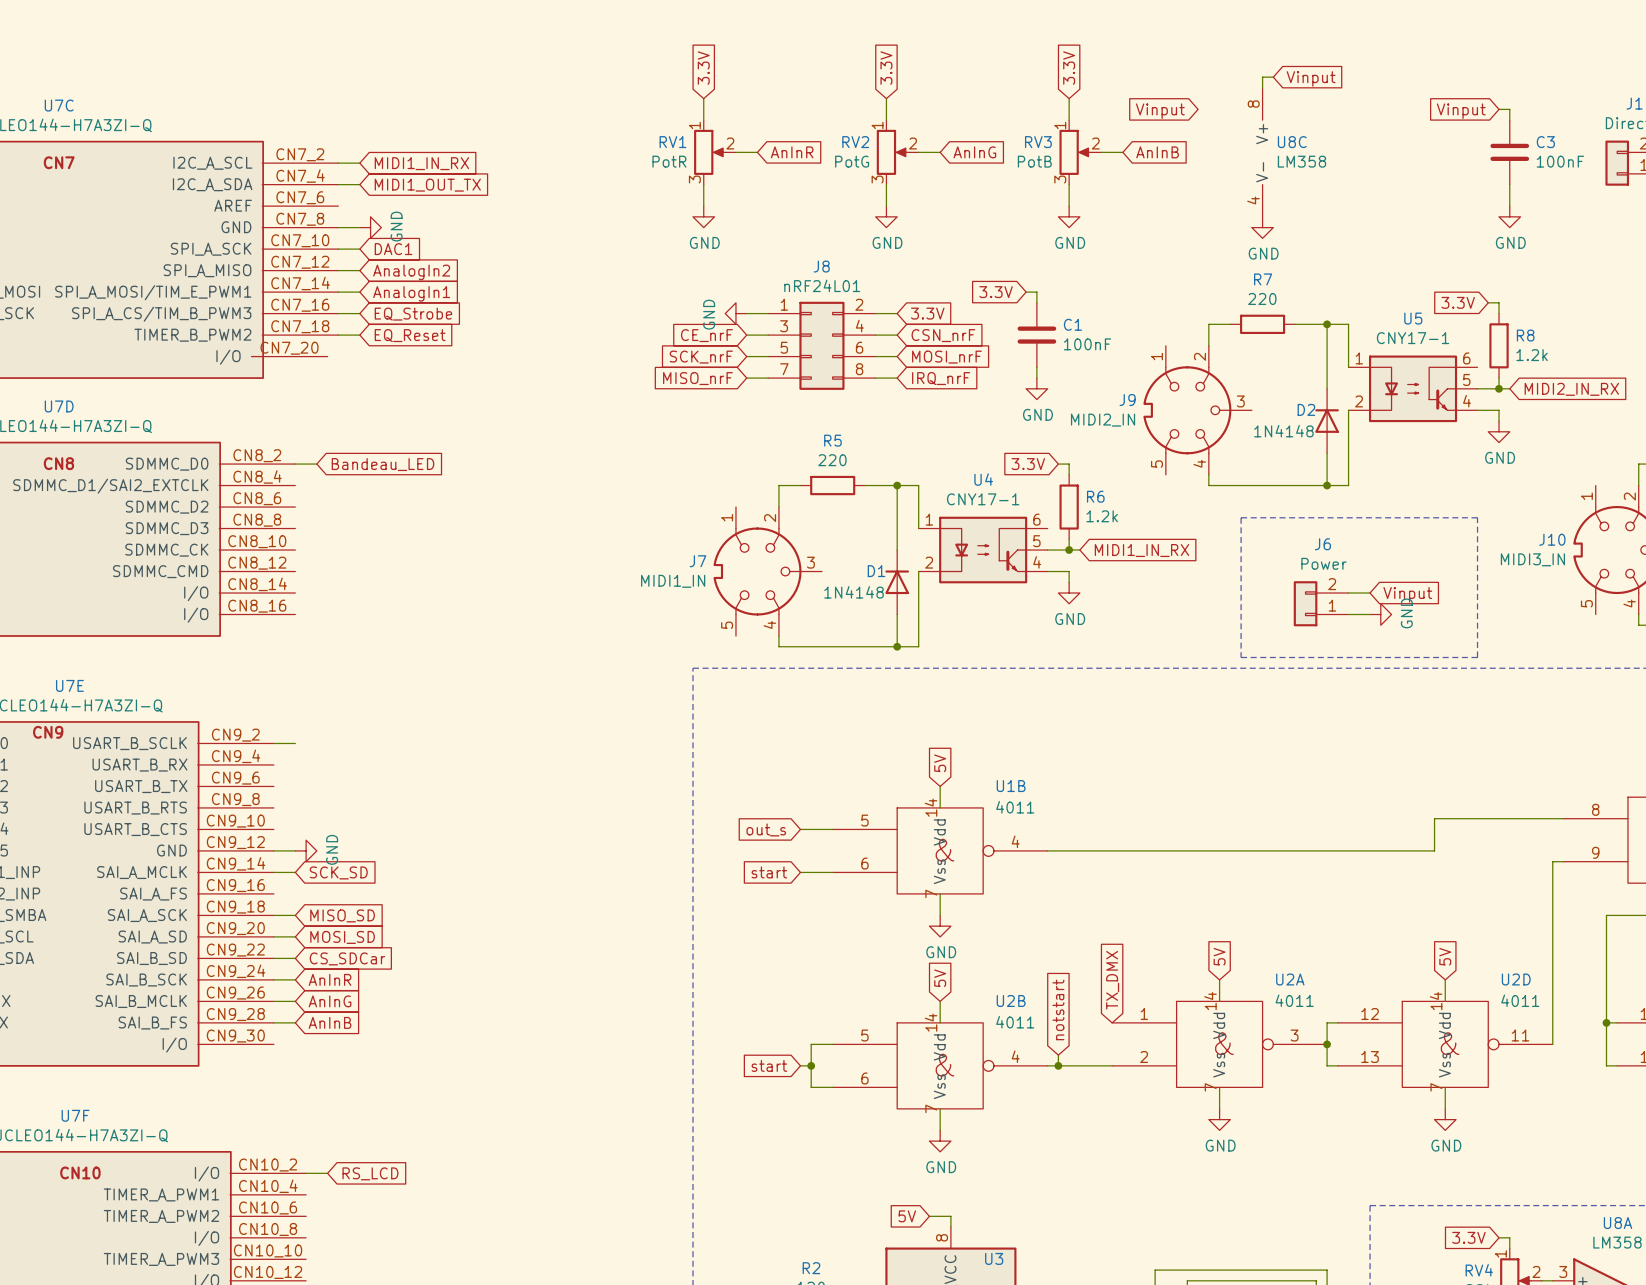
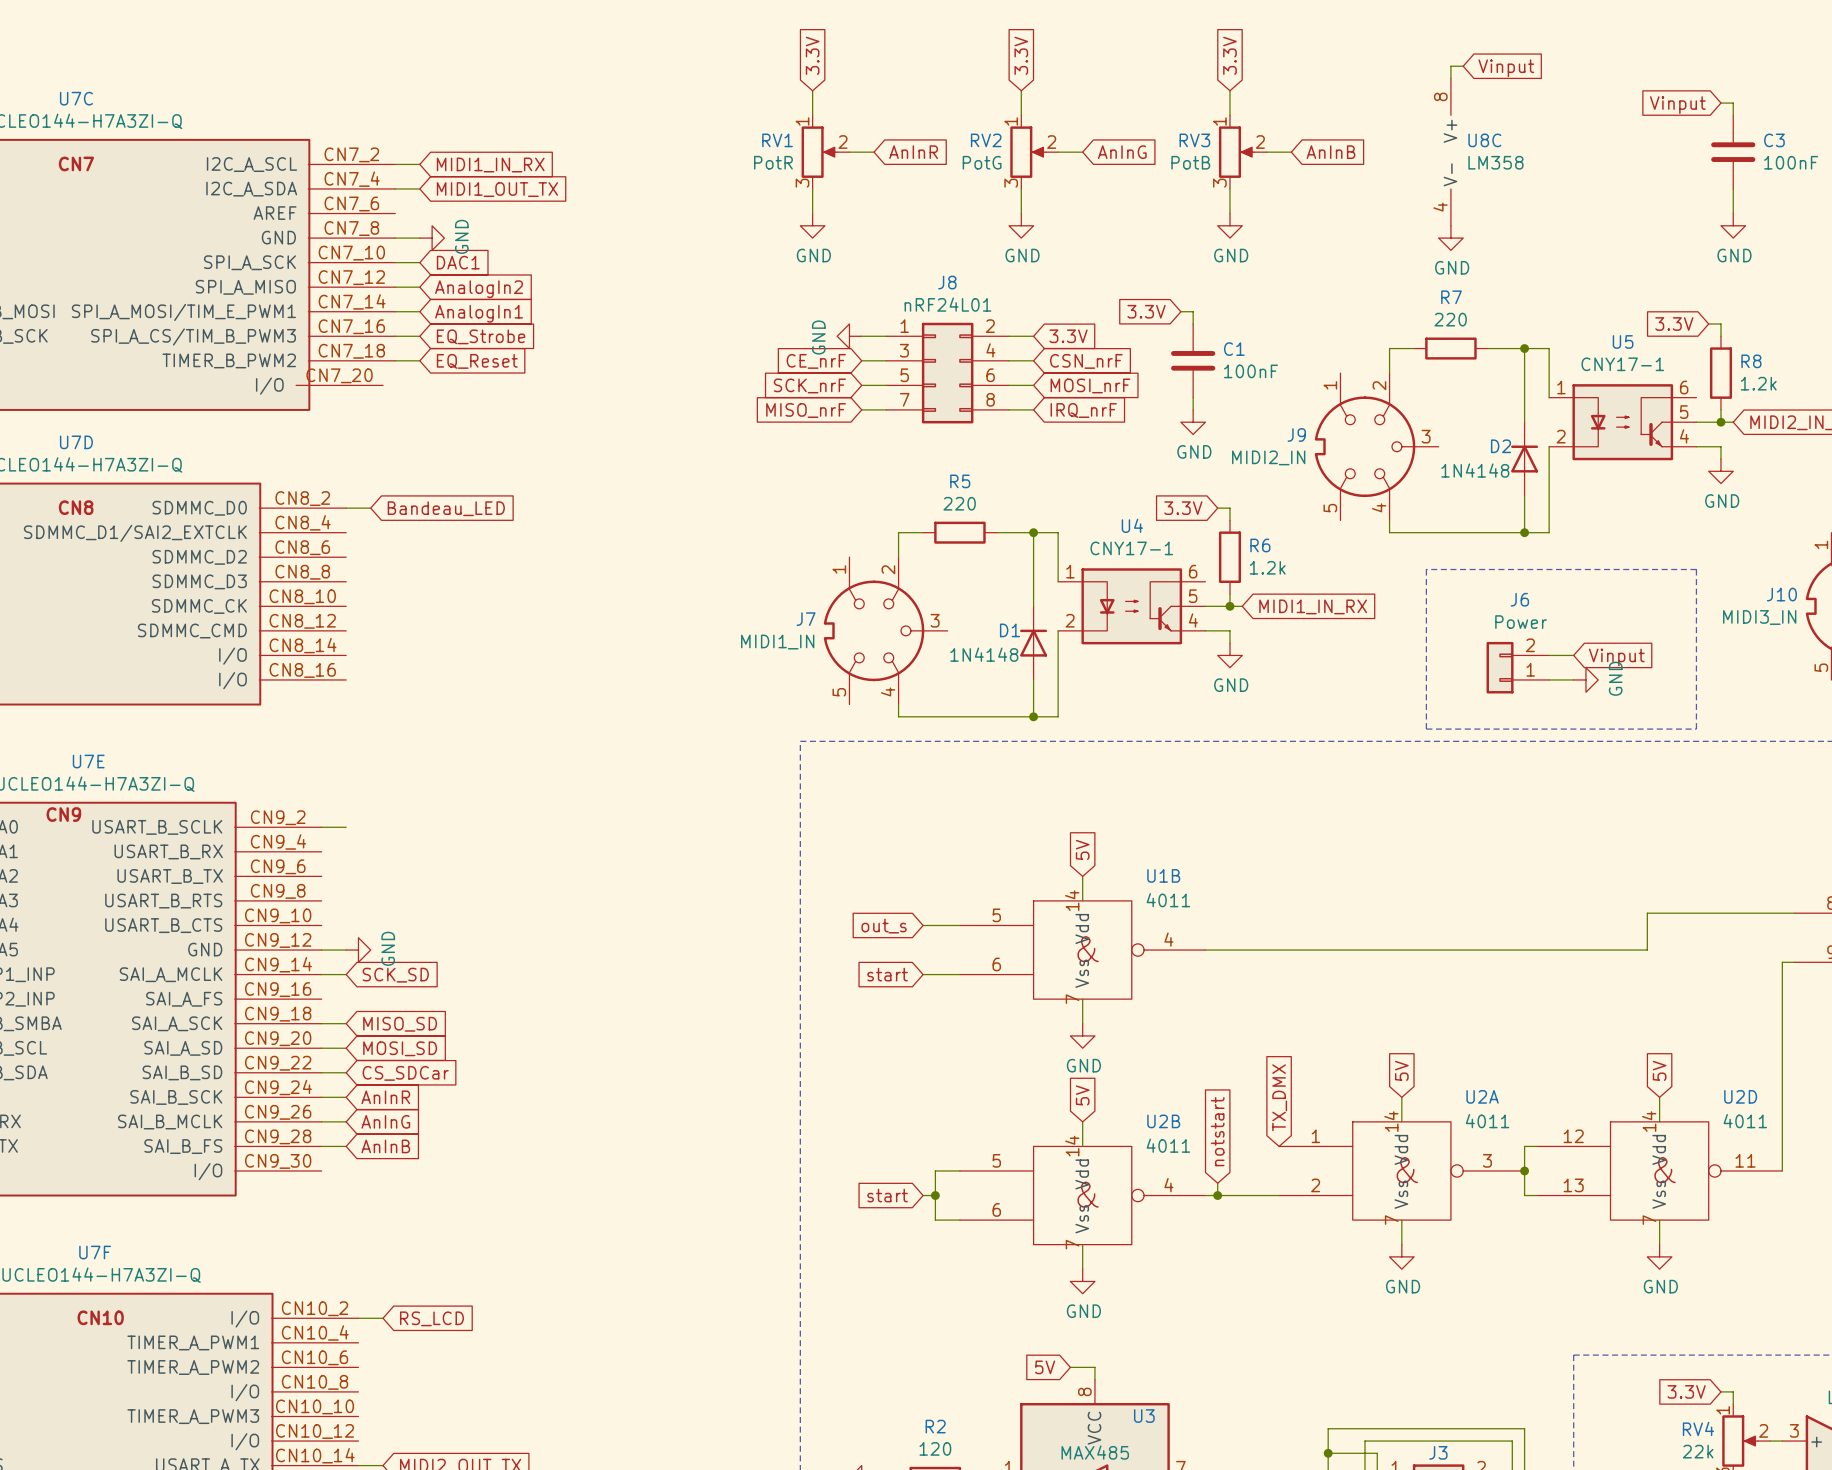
global label: Vinput (1160, 111) -> none

